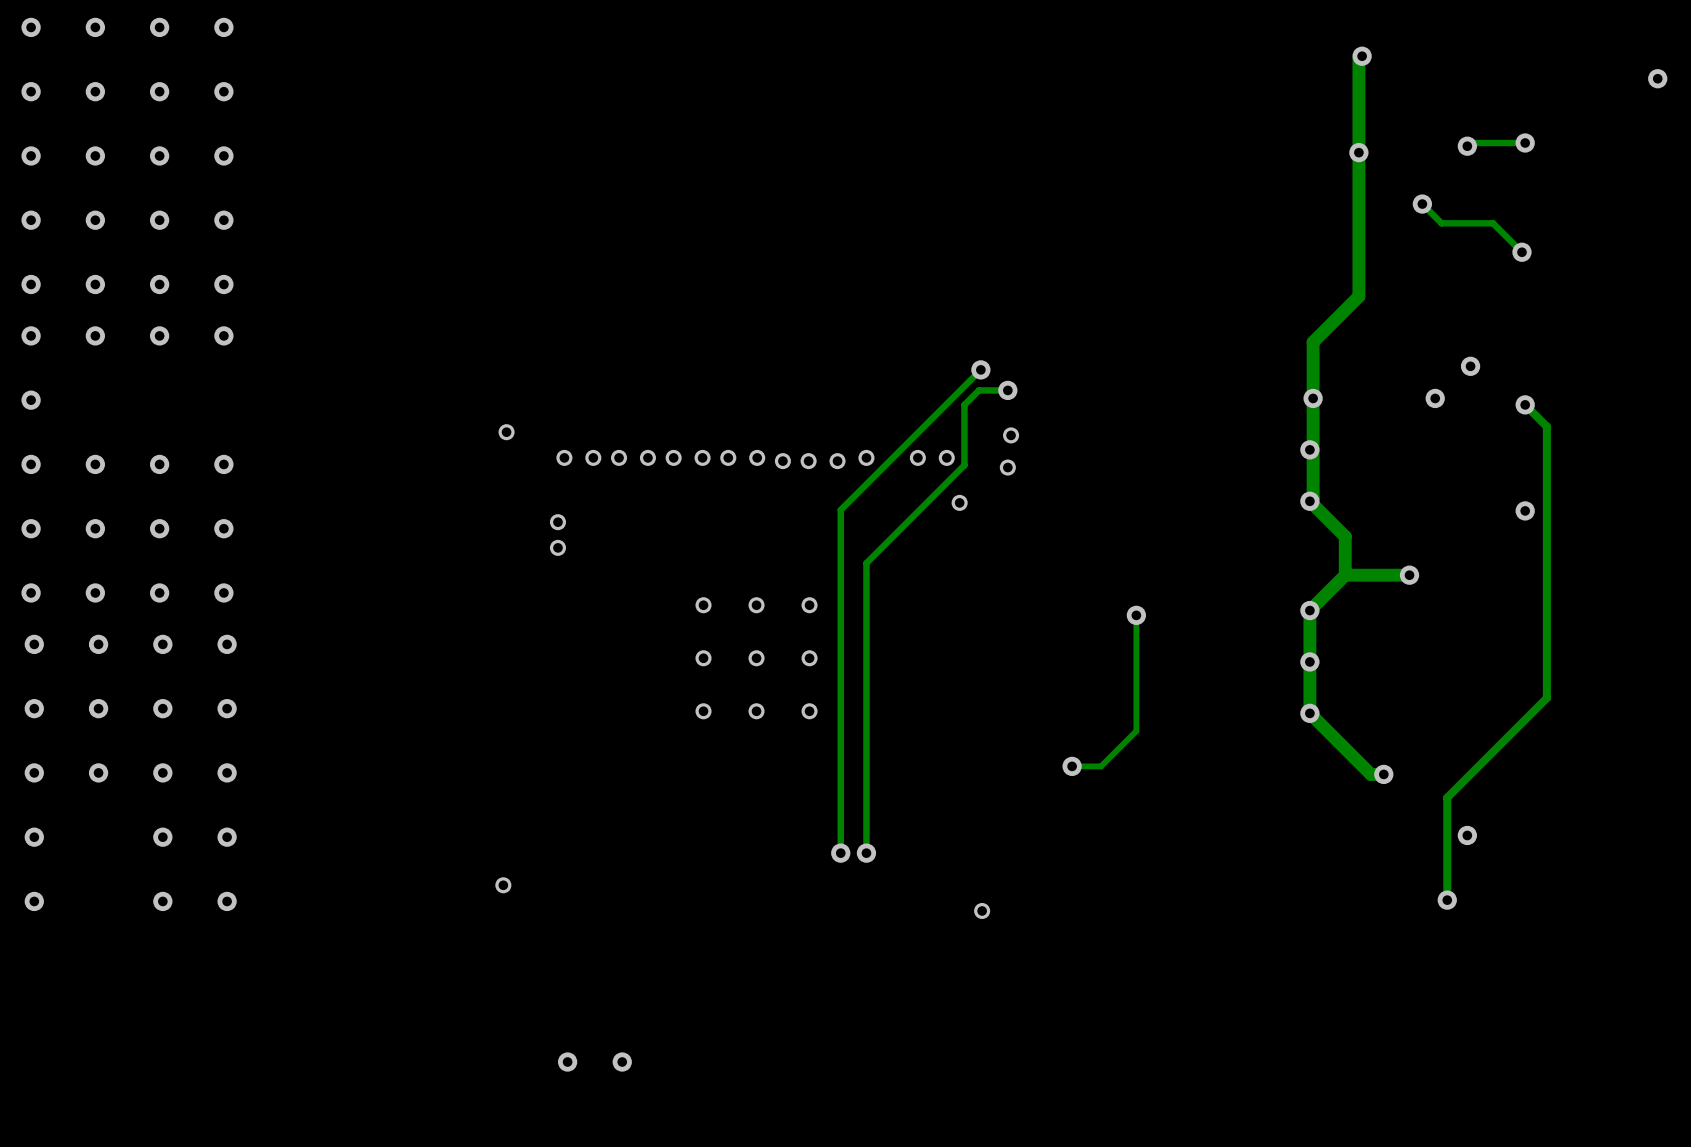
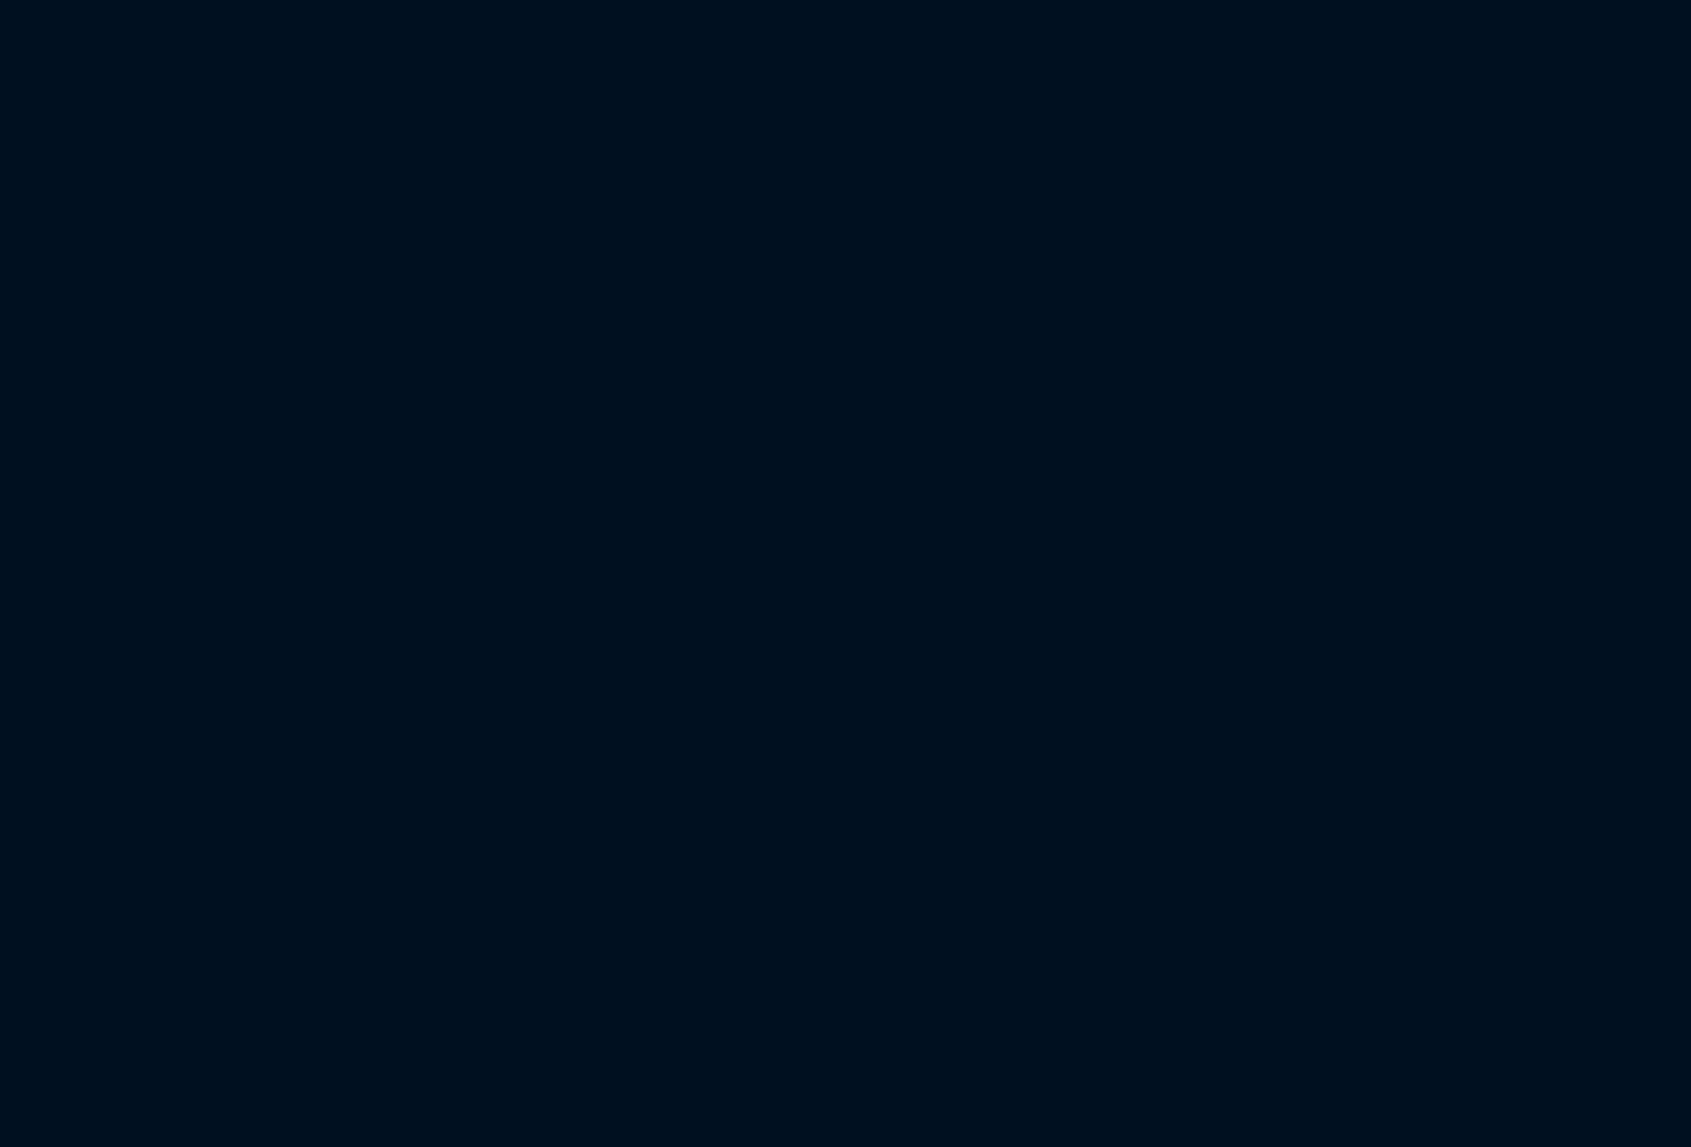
via: (31, 27) -> none
via: (95, 27) -> none
via: (159, 27) -> none
via: (223, 27) -> none
via: (1362, 56) -> none
track: (1358, 59) (1358, 296) (1313, 342) (1313, 498) (1309, 501) (1345, 536) (1345, 575) -> none
via: (1657, 78) -> none
via: (31, 91) -> none
via: (95, 91) -> none
via: (159, 91) -> none
via: (223, 91) -> none
track: (1525, 142) (1470, 142) (1467, 146) -> none
via: (1525, 142) -> none
via: (1467, 146) -> none
via: (1358, 152) -> none
via: (31, 155) -> none
via: (95, 155) -> none
via: (159, 155) -> none
via: (223, 155) -> none
track: (1422, 204) (1441, 223) (1493, 223) (1521, 252) -> none
via: (1422, 204) -> none
via: (31, 220) -> none
via: (95, 220) -> none
via: (159, 220) -> none
via: (223, 220) -> none
via: (1521, 252) -> none
via: (31, 284) -> none
via: (95, 284) -> none
via: (159, 284) -> none
via: (223, 284) -> none
via: (31, 335) -> none
via: (95, 335) -> none
via: (159, 335) -> none
via: (223, 335) -> none
via: (1470, 366) -> none
track: (980, 369) (840, 510) (840, 853) -> none
via: (980, 369) -> none
track: (1007, 390) (978, 390) (964, 404) (964, 465) (866, 563) (866, 853) -> none
via: (1007, 390) -> none
via: (1313, 398) -> none
via: (1435, 398) -> none
via: (31, 400) -> none
track: (1525, 404) (1546, 426) (1546, 698) (1447, 797) (1447, 900) -> none
via: (1525, 404) -> none
via: (506, 432) -> none
via: (1011, 435) -> none
via: (1309, 449) -> none
via: (564, 457) -> none
via: (593, 457) -> none
via: (619, 457) -> none
via: (647, 457) -> none
via: (673, 457) -> none
via: (702, 457) -> none
via: (728, 457) -> none
via: (757, 457) -> none
via: (866, 457) -> none
via: (917, 457) -> none
via: (946, 457) -> none
via: (782, 461) -> none
via: (808, 461) -> none
via: (837, 461) -> none
via: (31, 464) -> none
via: (95, 464) -> none
via: (159, 464) -> none
via: (223, 464) -> none
via: (1007, 467) -> none
via: (1309, 501) -> none
via: (959, 502) -> none
via: (1525, 510) -> none
via: (557, 522) -> none
via: (31, 528) -> none
via: (95, 528) -> none
via: (159, 528) -> none
via: (223, 528) -> none
via: (557, 547) -> none
track: (1345, 575) (1309, 610) (1309, 713) (1370, 774) (1383, 774) -> none
track: (1409, 575) (1345, 575) -> none
via: (1409, 575) -> none
via: (31, 592) -> none
via: (95, 592) -> none
via: (159, 592) -> none
via: (223, 592) -> none
via: (703, 605) -> none
via: (756, 605) -> none
via: (809, 605) -> none
via: (1309, 610) -> none
track: (1136, 615) (1136, 731) (1101, 766) (1072, 766) -> none
via: (1136, 615) -> none
via: (34, 644) -> none
via: (98, 644) -> none
via: (162, 644) -> none
via: (227, 644) -> none
via: (703, 658) -> none
via: (756, 658) -> none
via: (809, 658) -> none
via: (1309, 661) -> none
via: (34, 708) -> none
via: (98, 708) -> none
via: (162, 708) -> none
via: (227, 708) -> none
via: (703, 711) -> none
via: (756, 711) -> none
via: (809, 711) -> none
via: (1309, 713) -> none
via: (1072, 766) -> none
via: (34, 772) -> none
via: (98, 772) -> none
via: (162, 772) -> none
via: (227, 772) -> none
via: (1383, 774) -> none
via: (1467, 835) -> none
via: (34, 837) -> none
via: (162, 837) -> none
via: (227, 837) -> none
via: (840, 853) -> none
via: (866, 853) -> none
via: (503, 885) -> none
via: (1447, 900) -> none
via: (34, 901) -> none
via: (162, 901) -> none
via: (227, 901) -> none
via: (982, 910) -> none
via: (567, 1062) -> none
via: (622, 1062) -> none

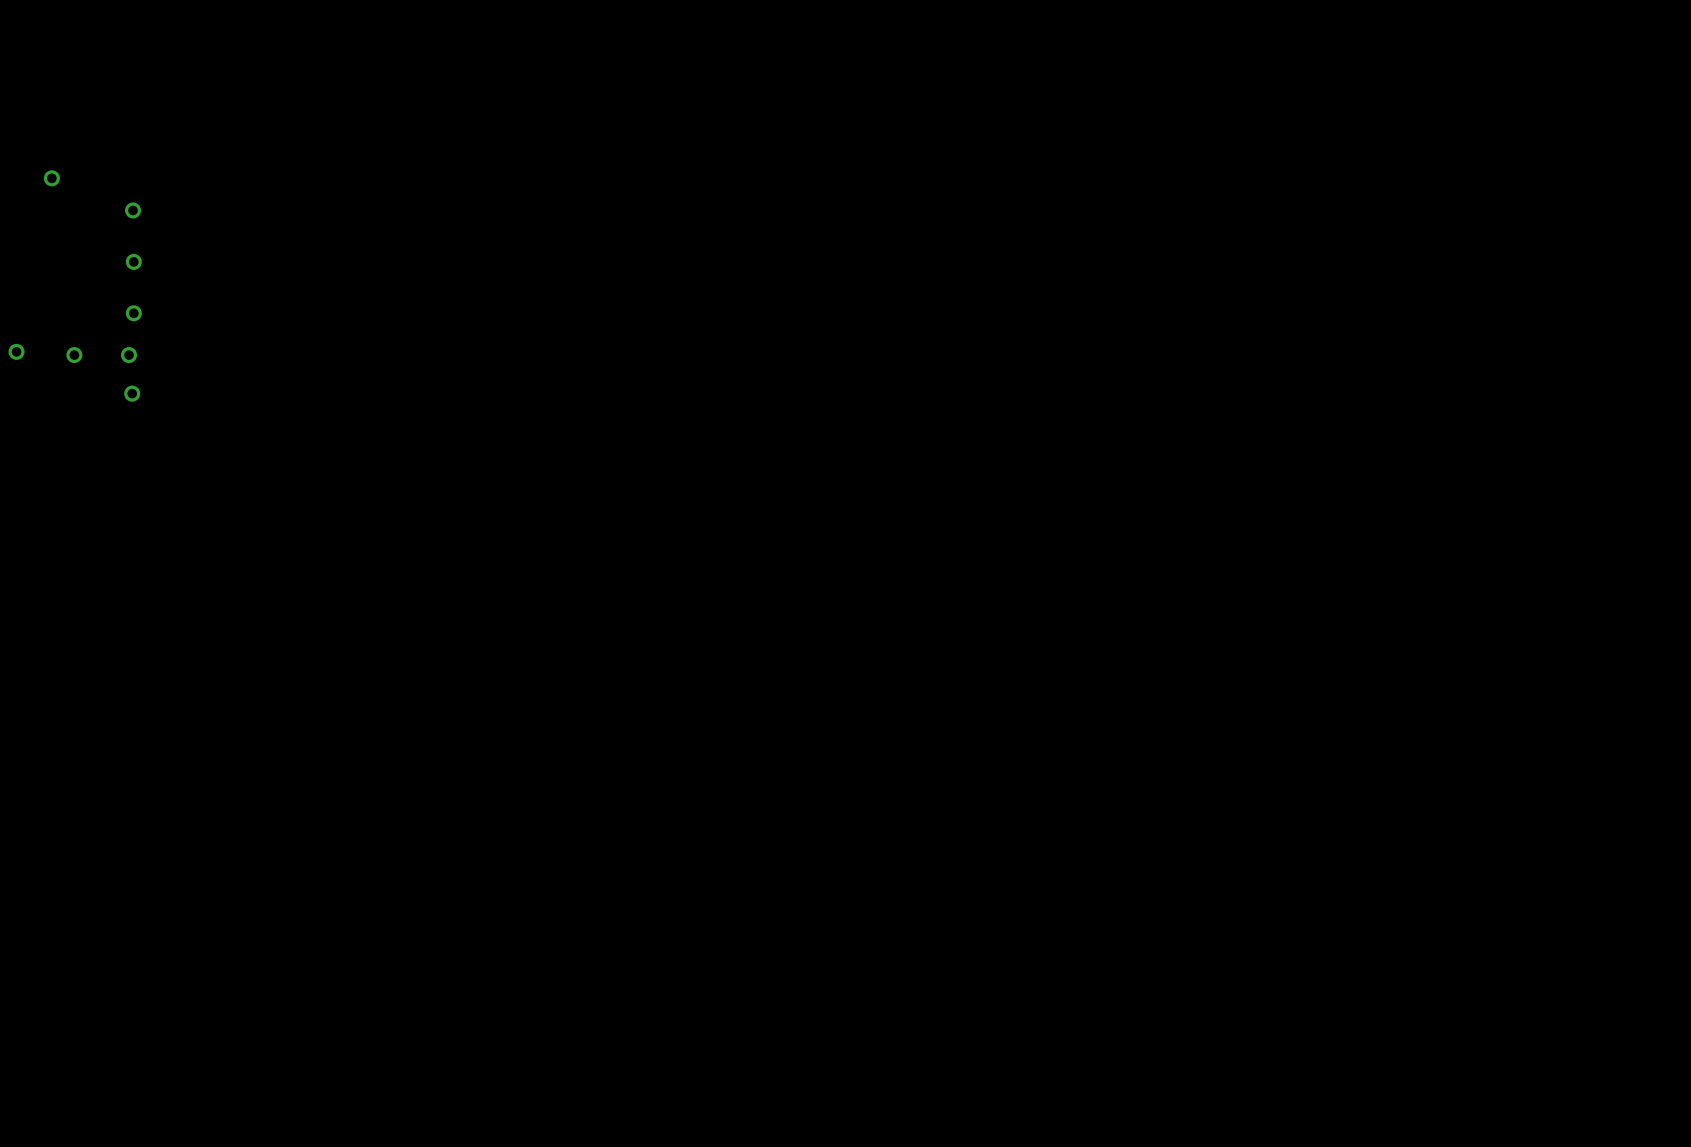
via: none -> (51, 178)
via: none -> (133, 210)
via: none -> (133, 261)
via: none -> (133, 313)
via: none -> (16, 351)
via: none -> (74, 355)
via: none -> (128, 355)
via: none -> (132, 393)

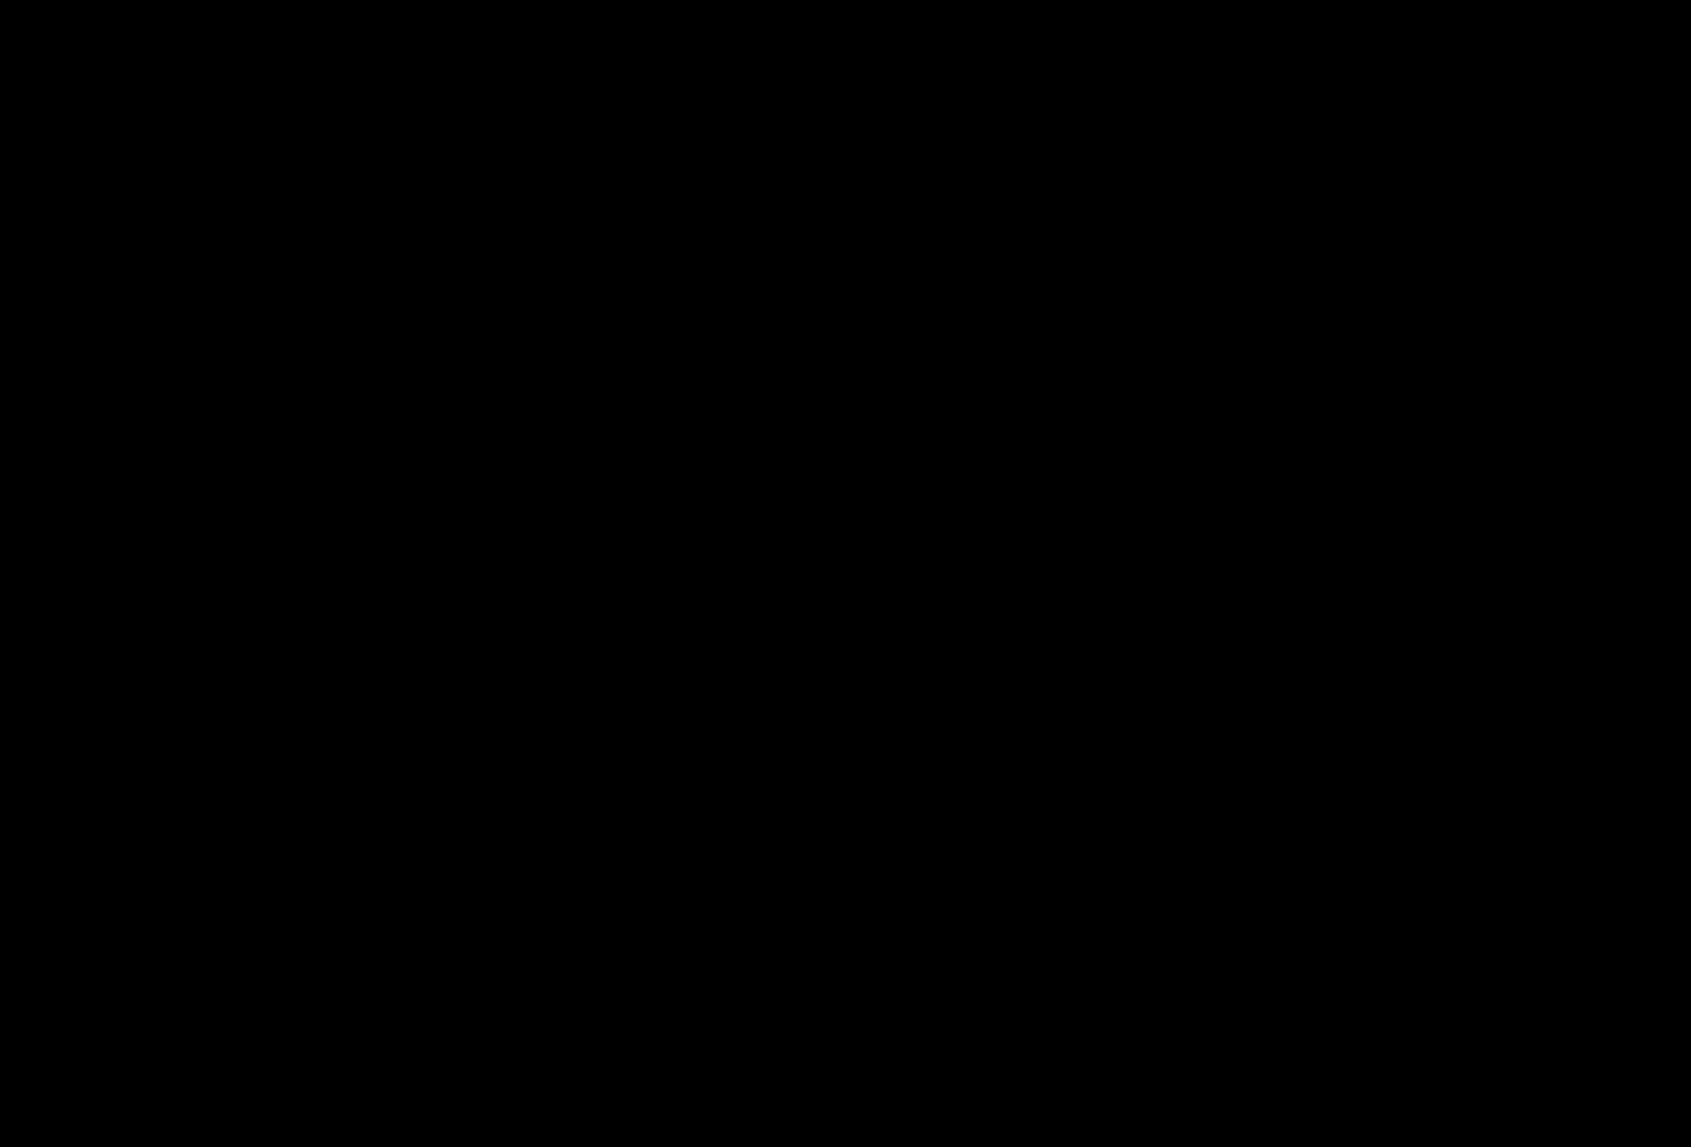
via: (51, 178) -> none
via: (133, 210) -> none
via: (133, 261) -> none
via: (133, 313) -> none
via: (16, 351) -> none
via: (74, 355) -> none
via: (128, 355) -> none
via: (132, 393) -> none

